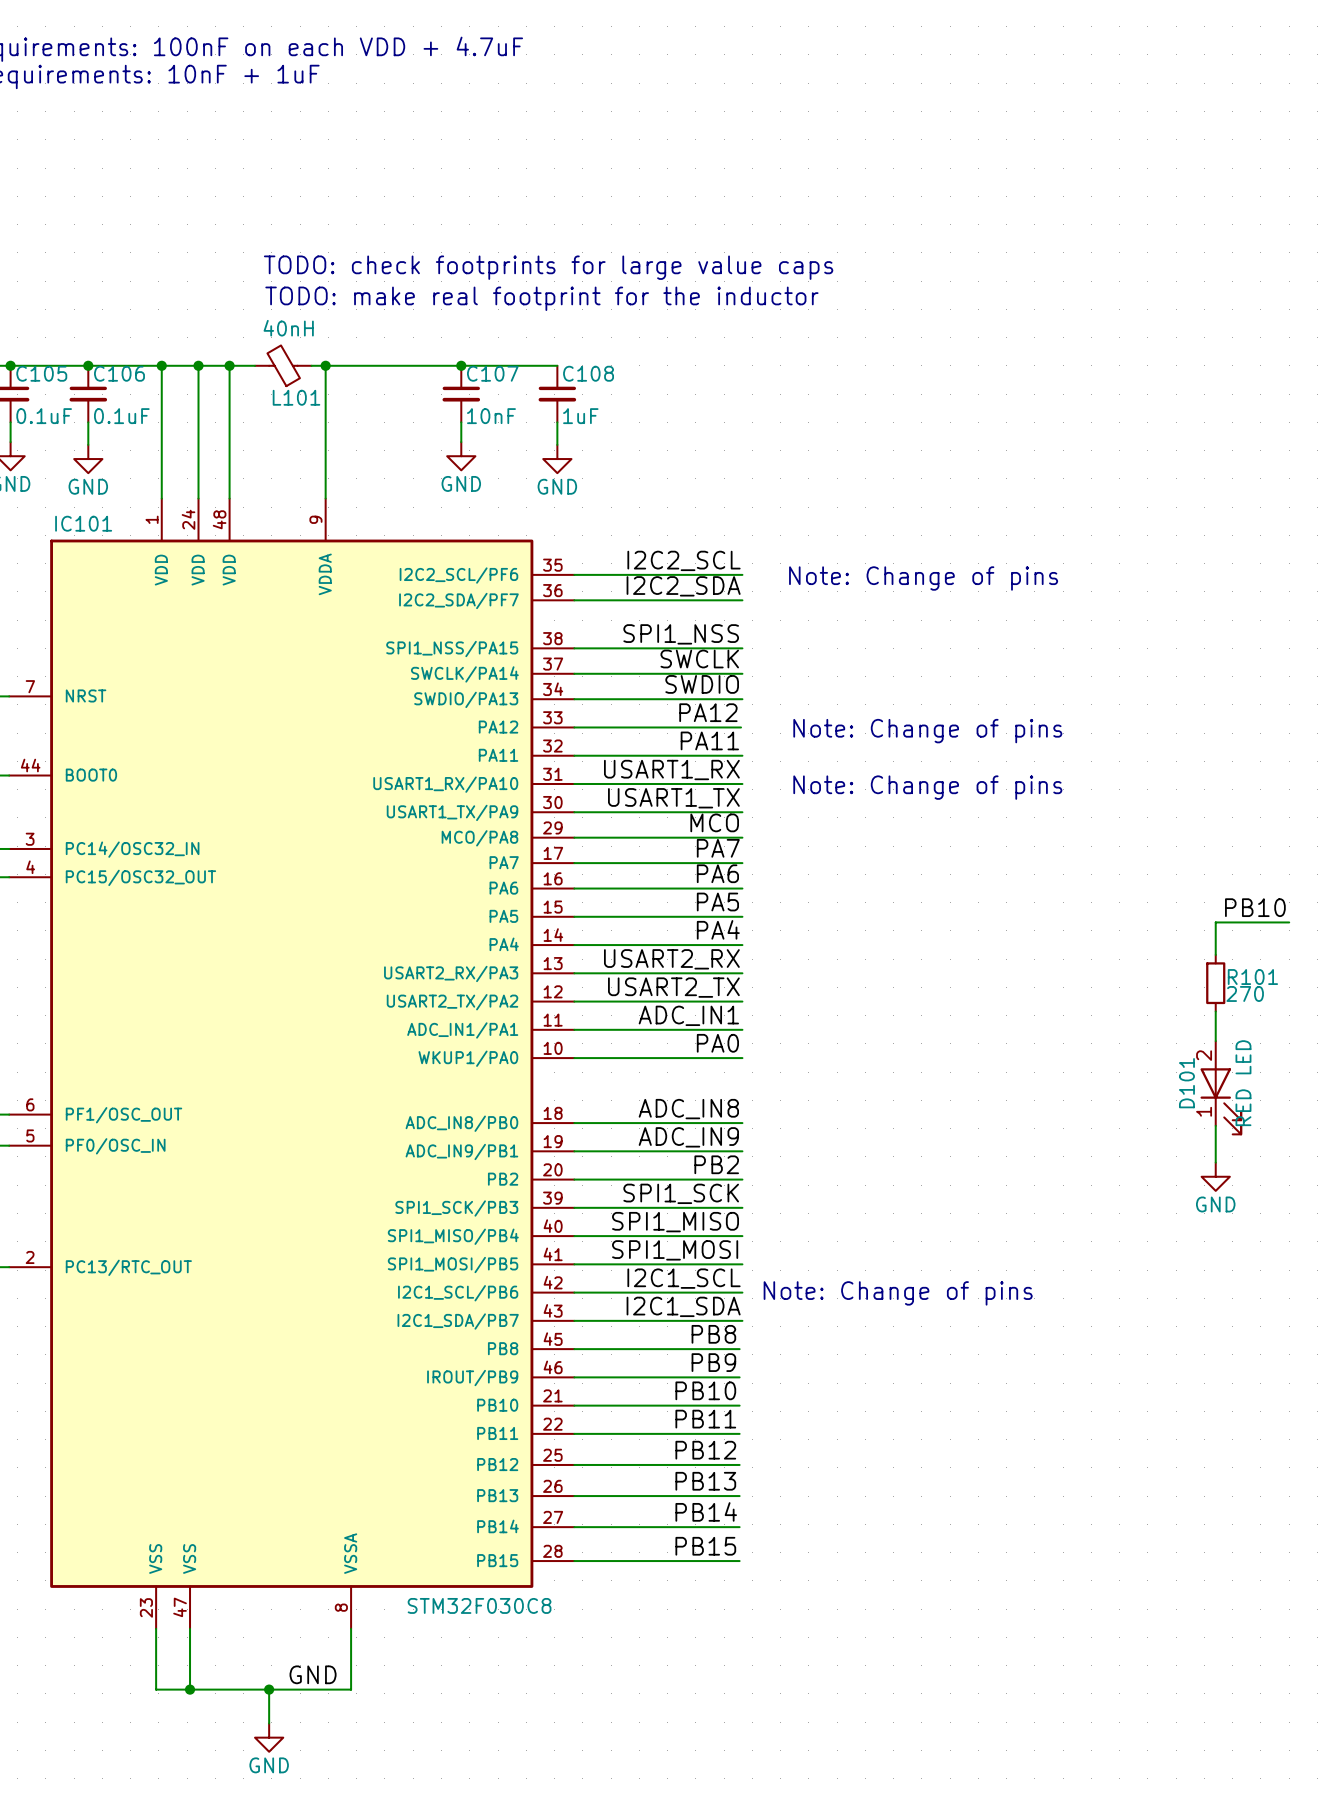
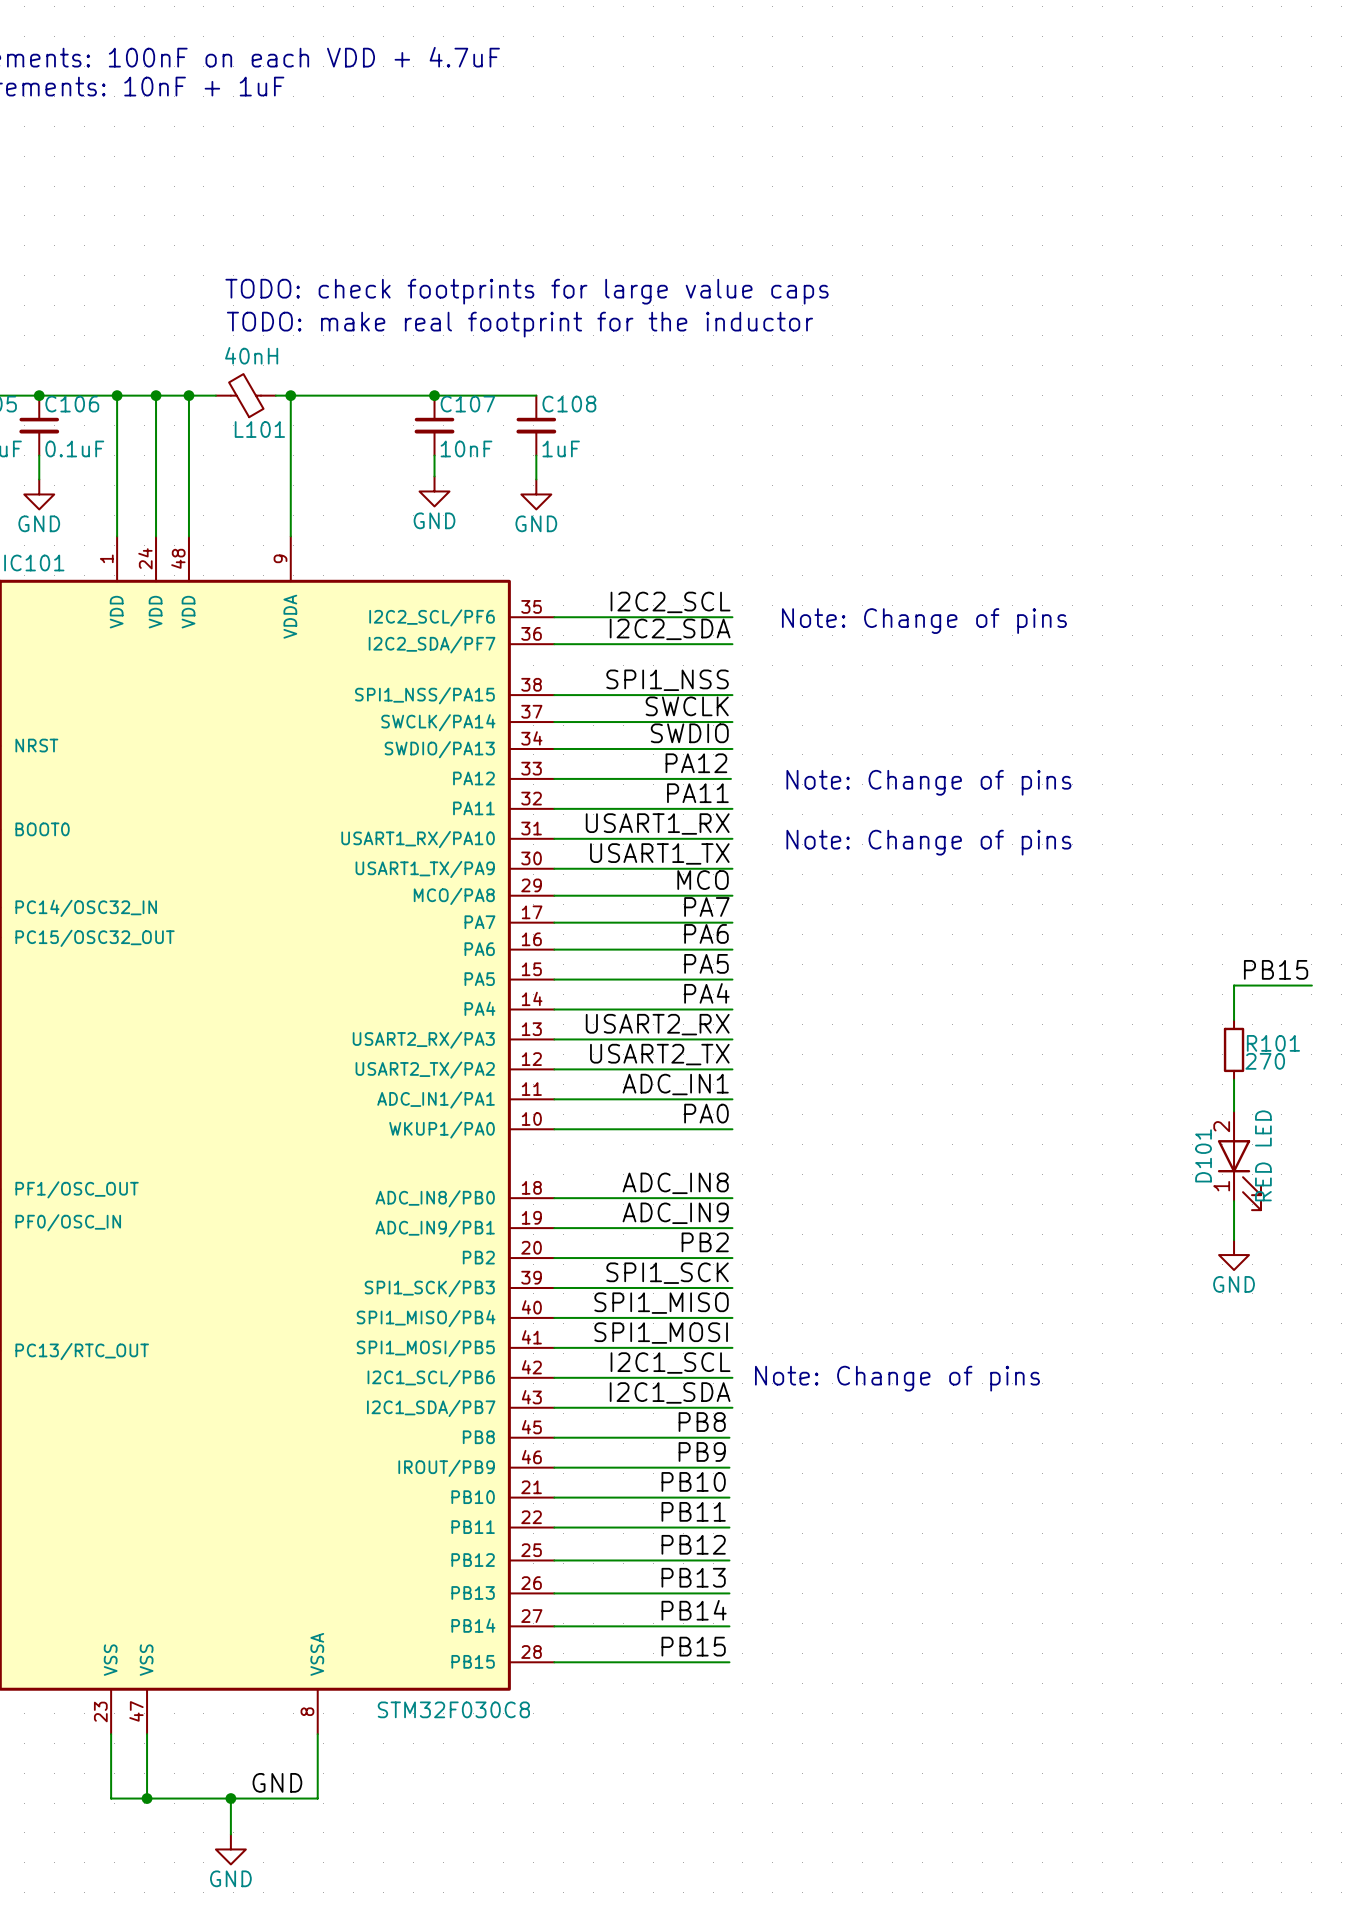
label: PB10 (1255, 907) -> PB15 (1276, 969)

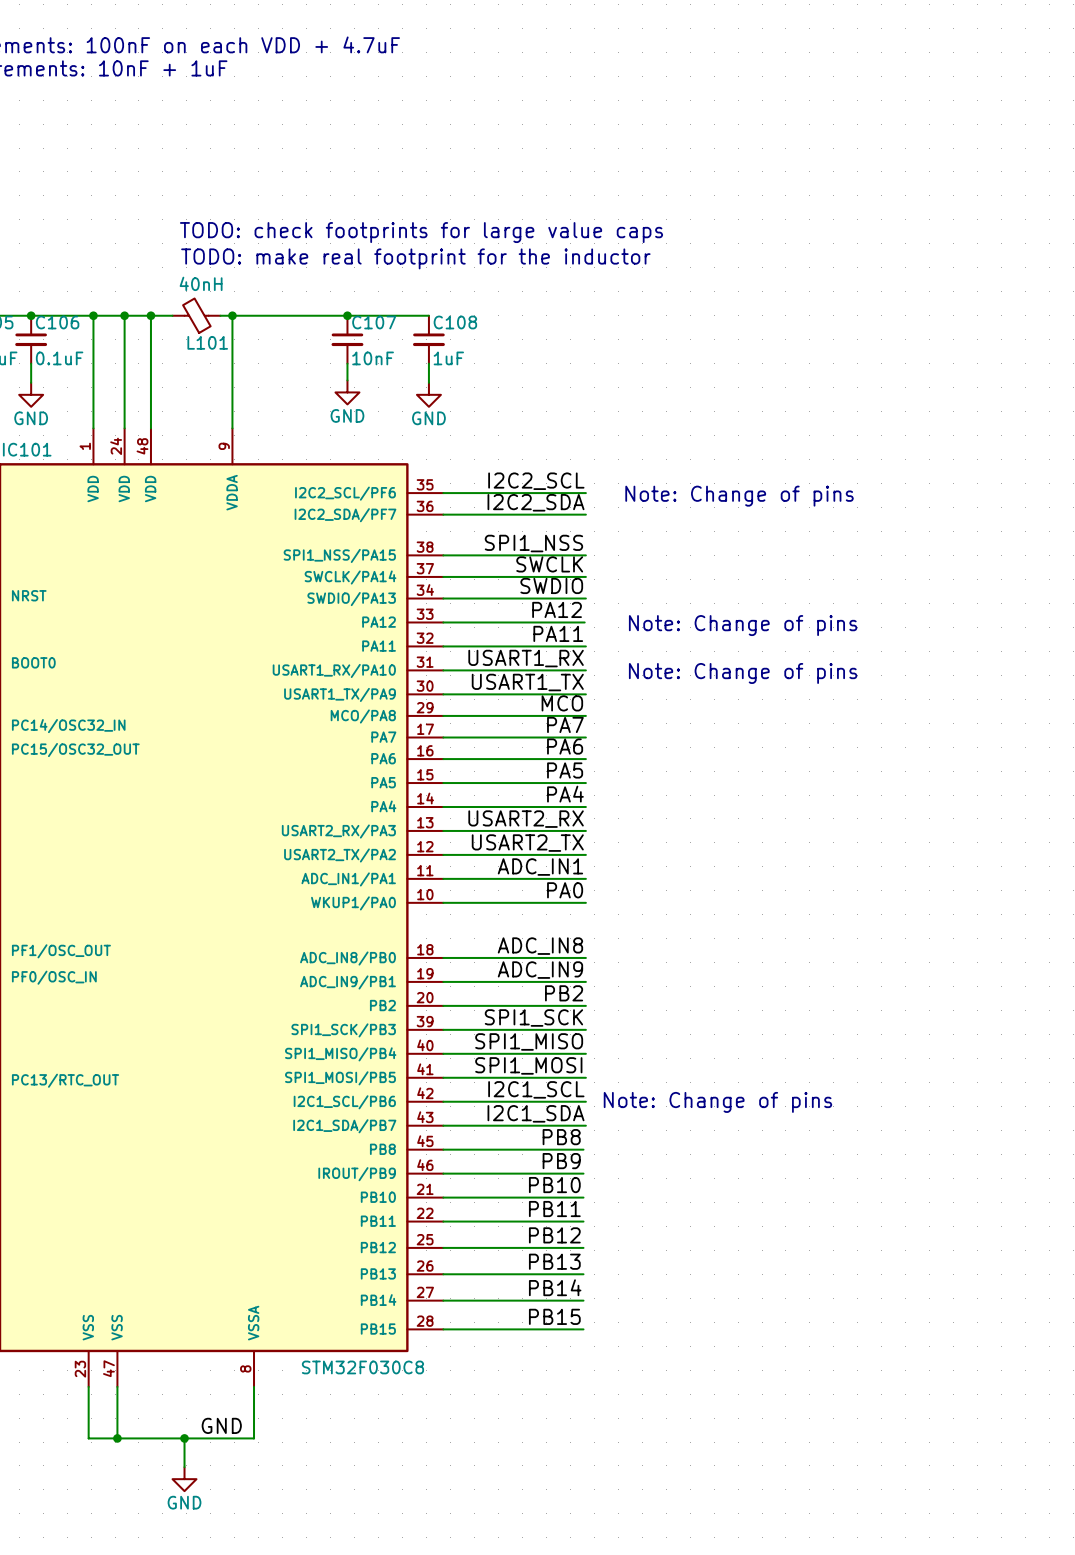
label: PB15 (1276, 969) -> none
wire: (1311, 985) (1234, 985) (1234, 1019) -> none
R101: 270 (1234, 1049) -> none
wire: (1234, 1079) (1234, 1111) -> none
D101: RED LED (1239, 1160) -> none
wire: (1234, 1201) (1234, 1240) -> none
power symbol: GND (1234, 1255) -> none

